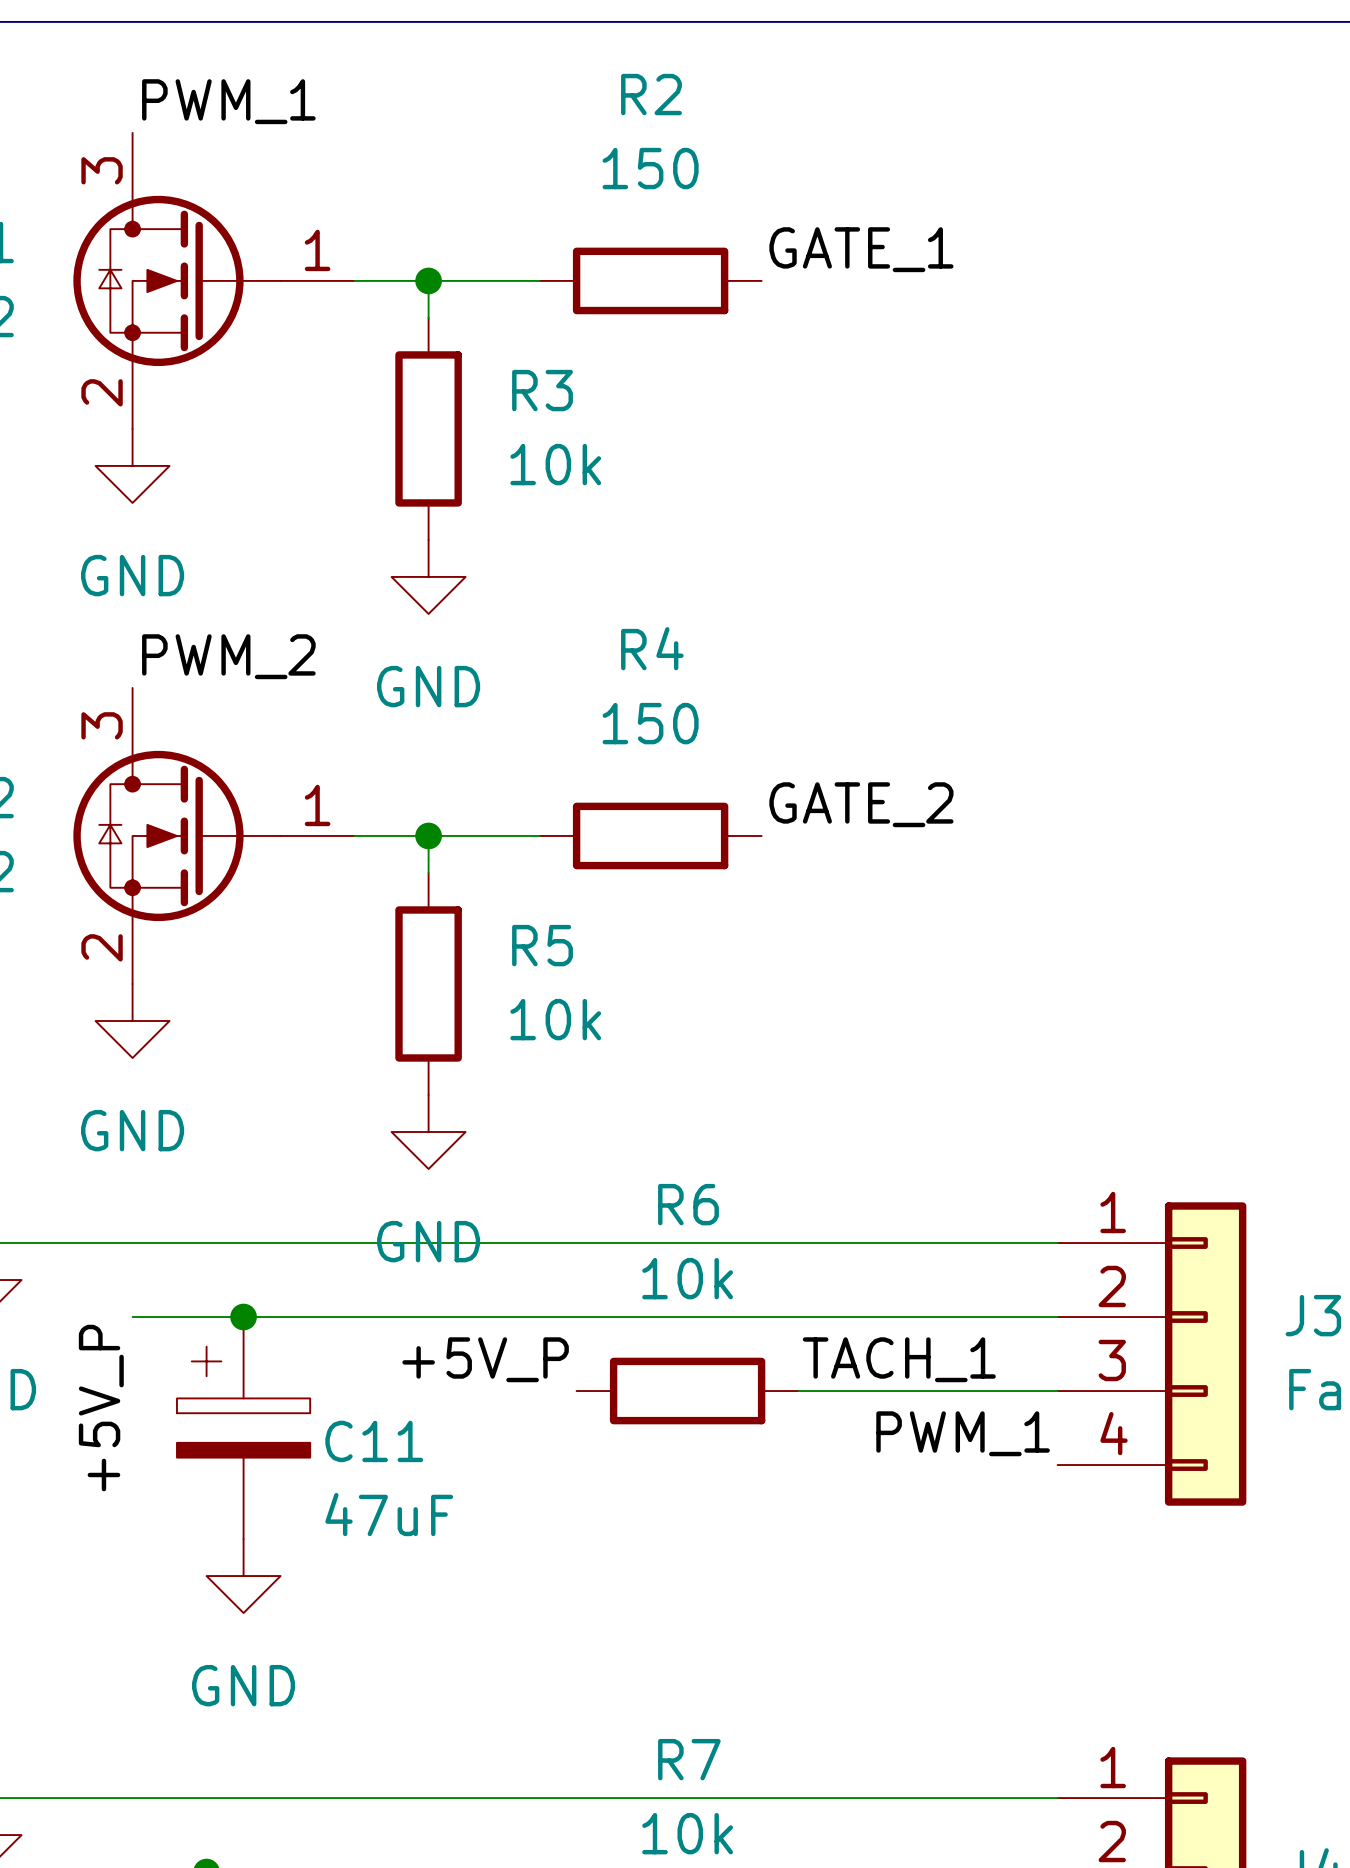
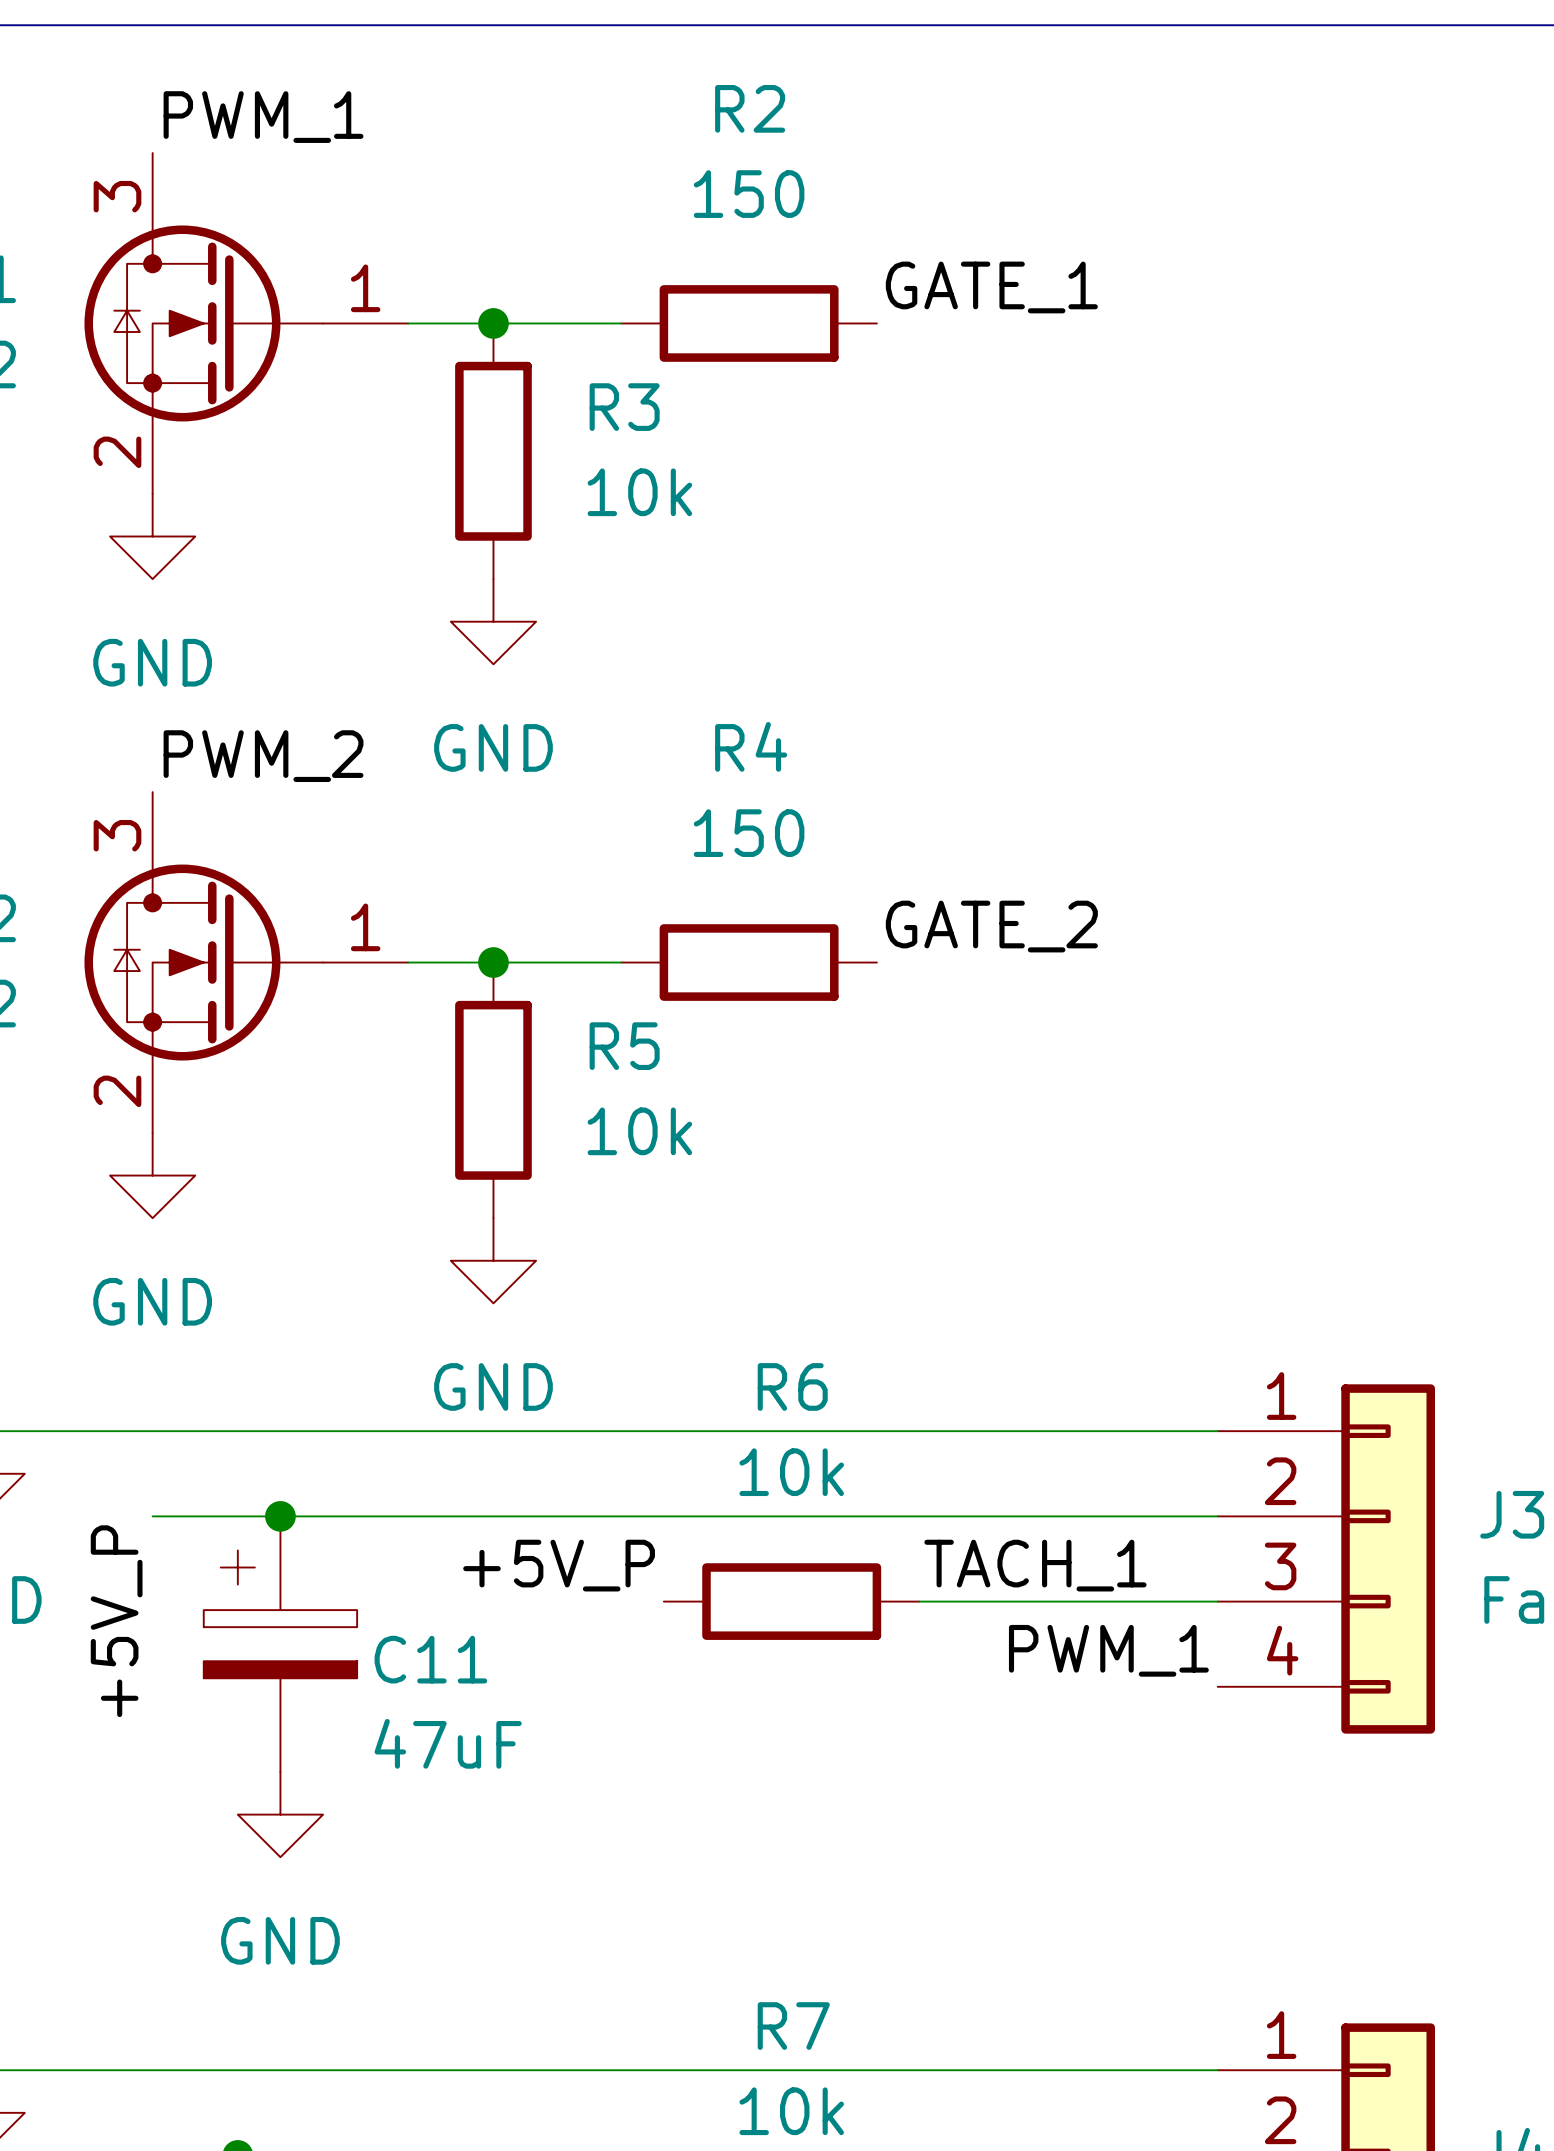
R3 position: (428, 428) -> (493, 451)
power symbol position: GND (428, 576) -> GND (493, 621)
R5 position: (428, 983) -> (493, 1090)
power symbol position: GND (428, 1132) -> GND (493, 1260)

